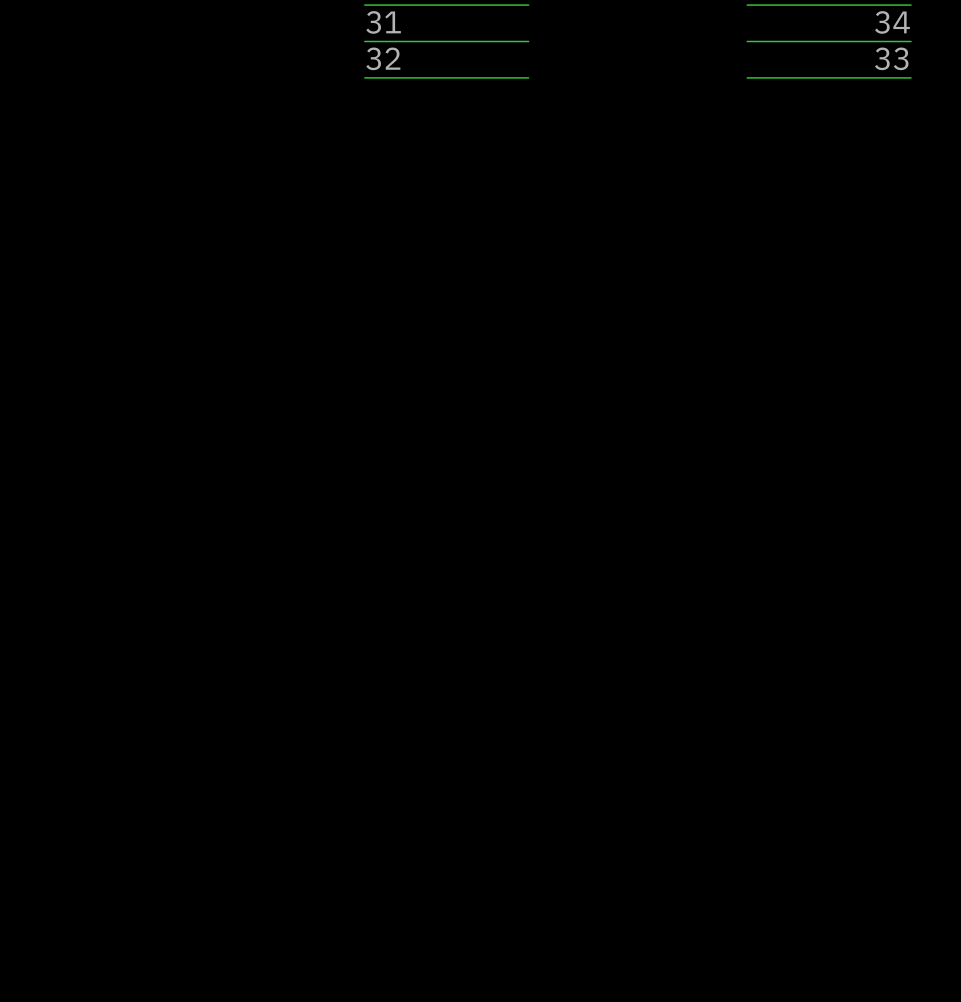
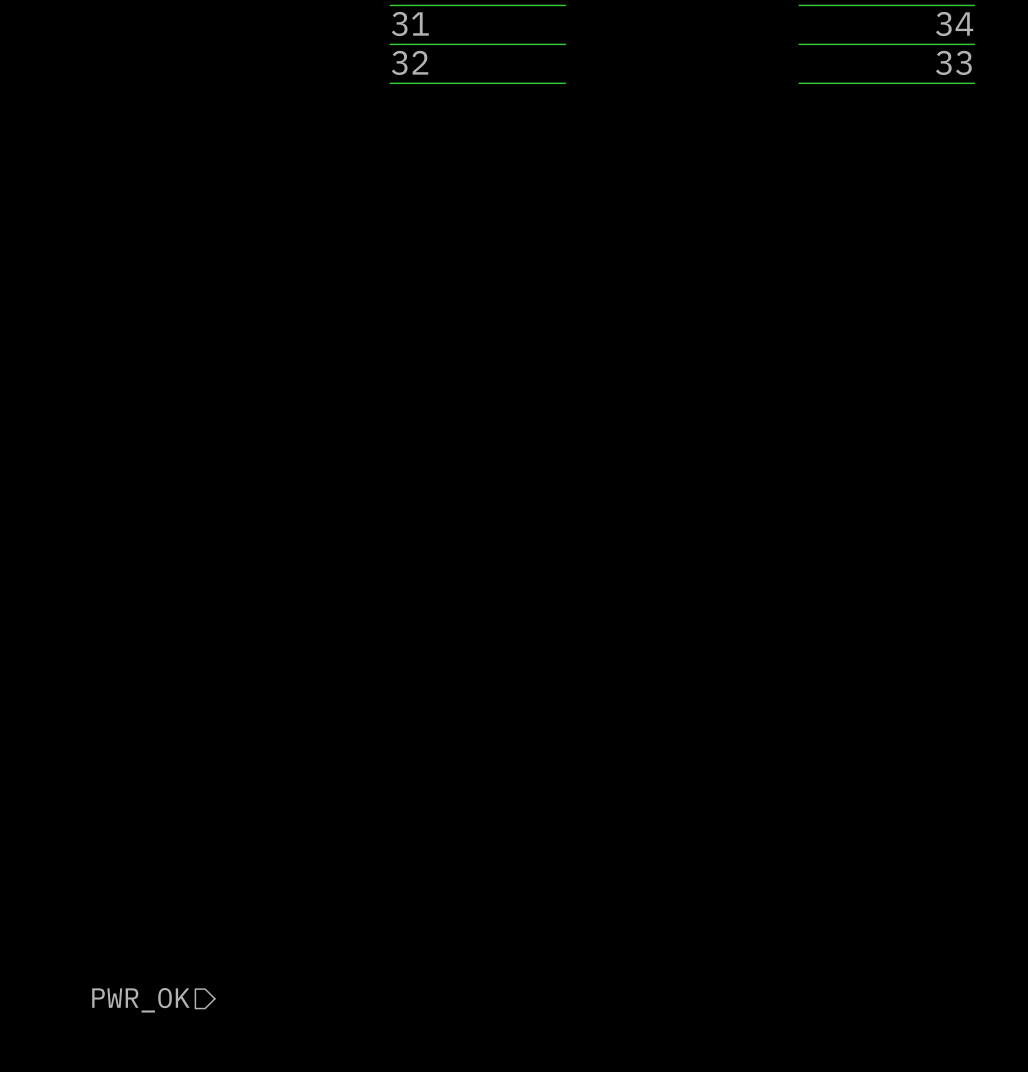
hierarchical label: none -> PWR_OK (140, 1000)

